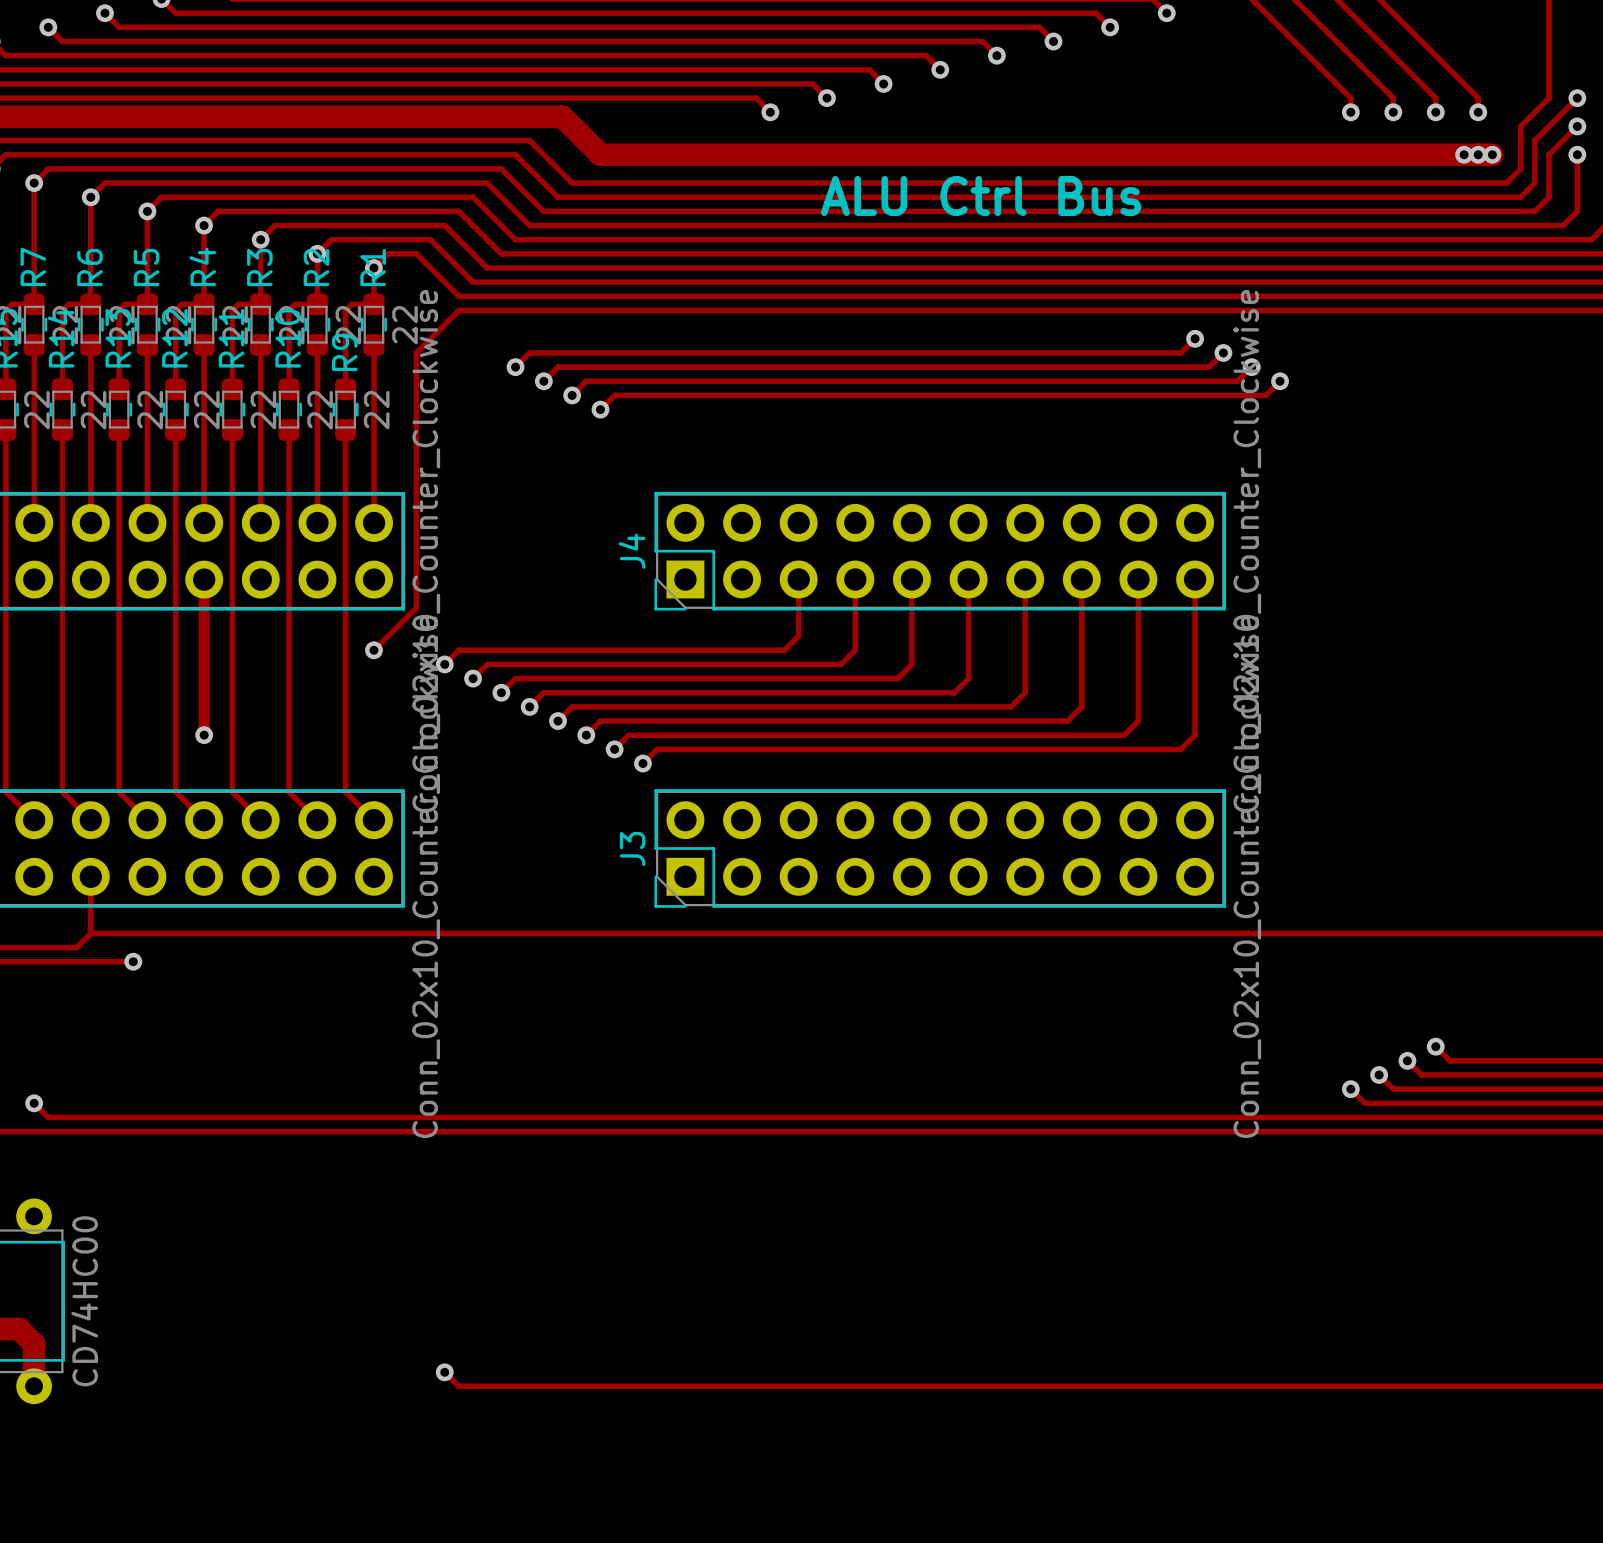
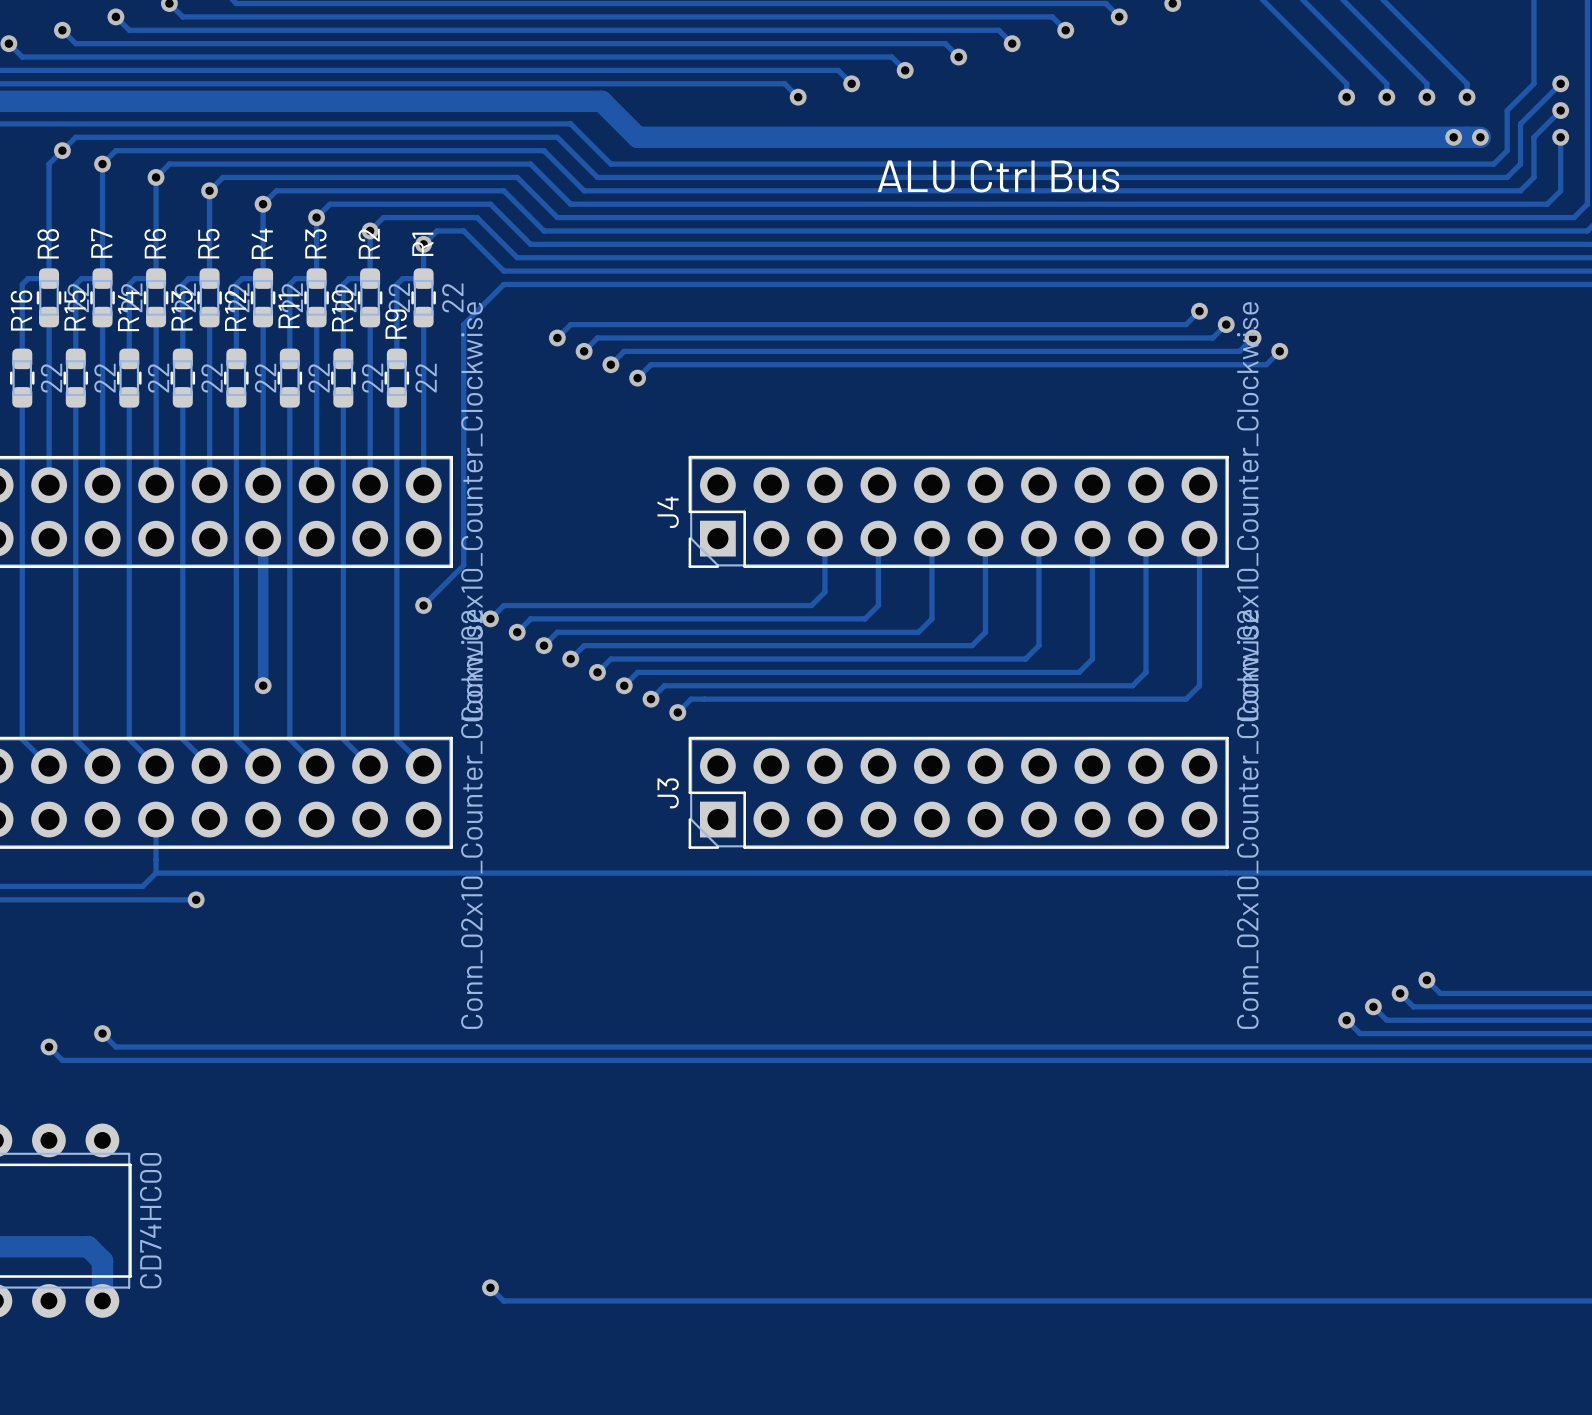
via: (1478, 154) -> none

